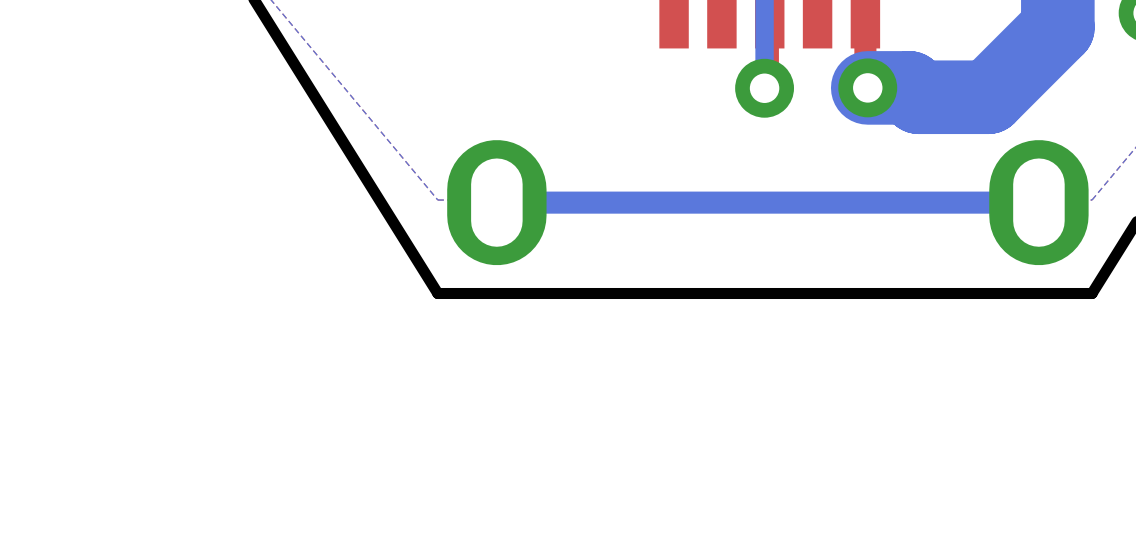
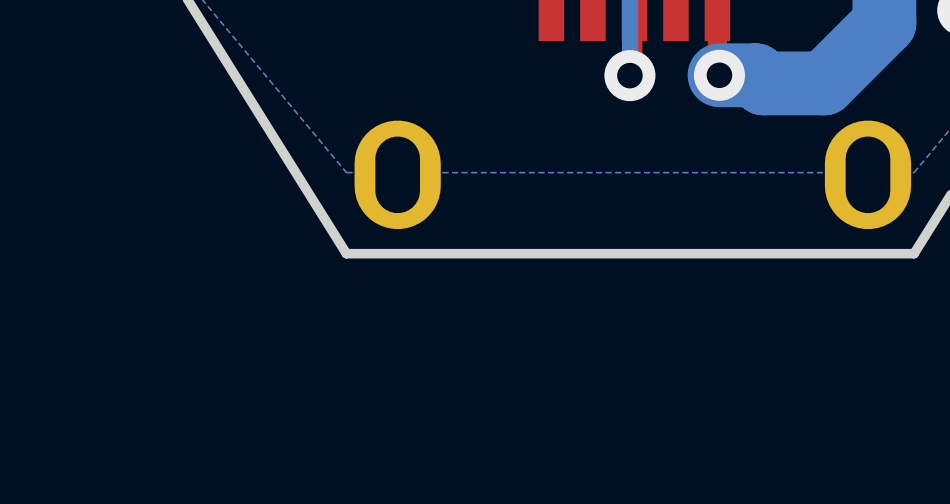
bottom track: (1038, 202) (496, 202) -> none

